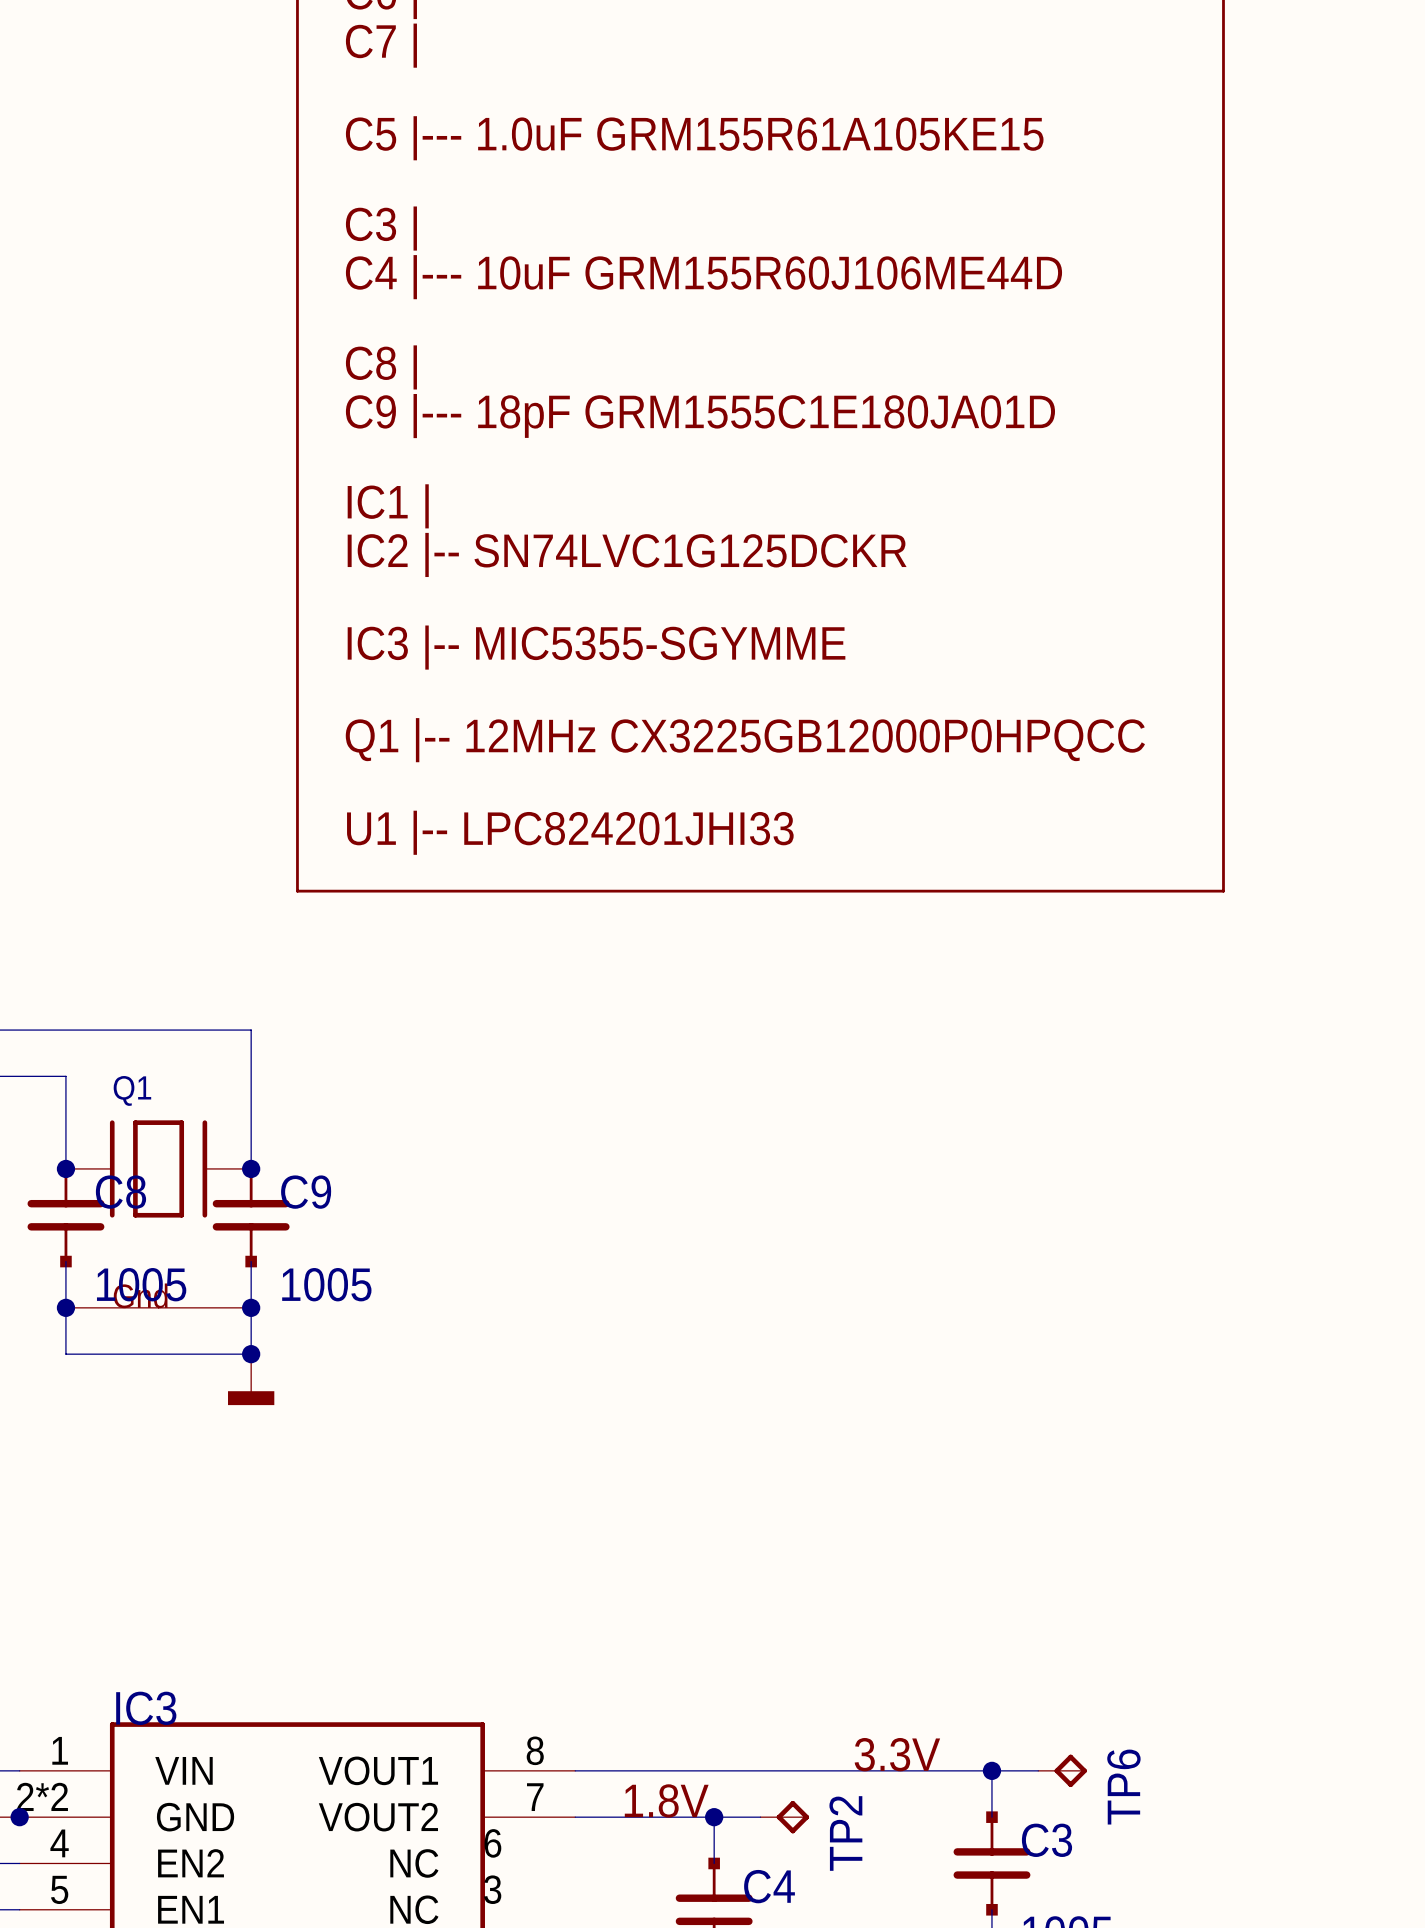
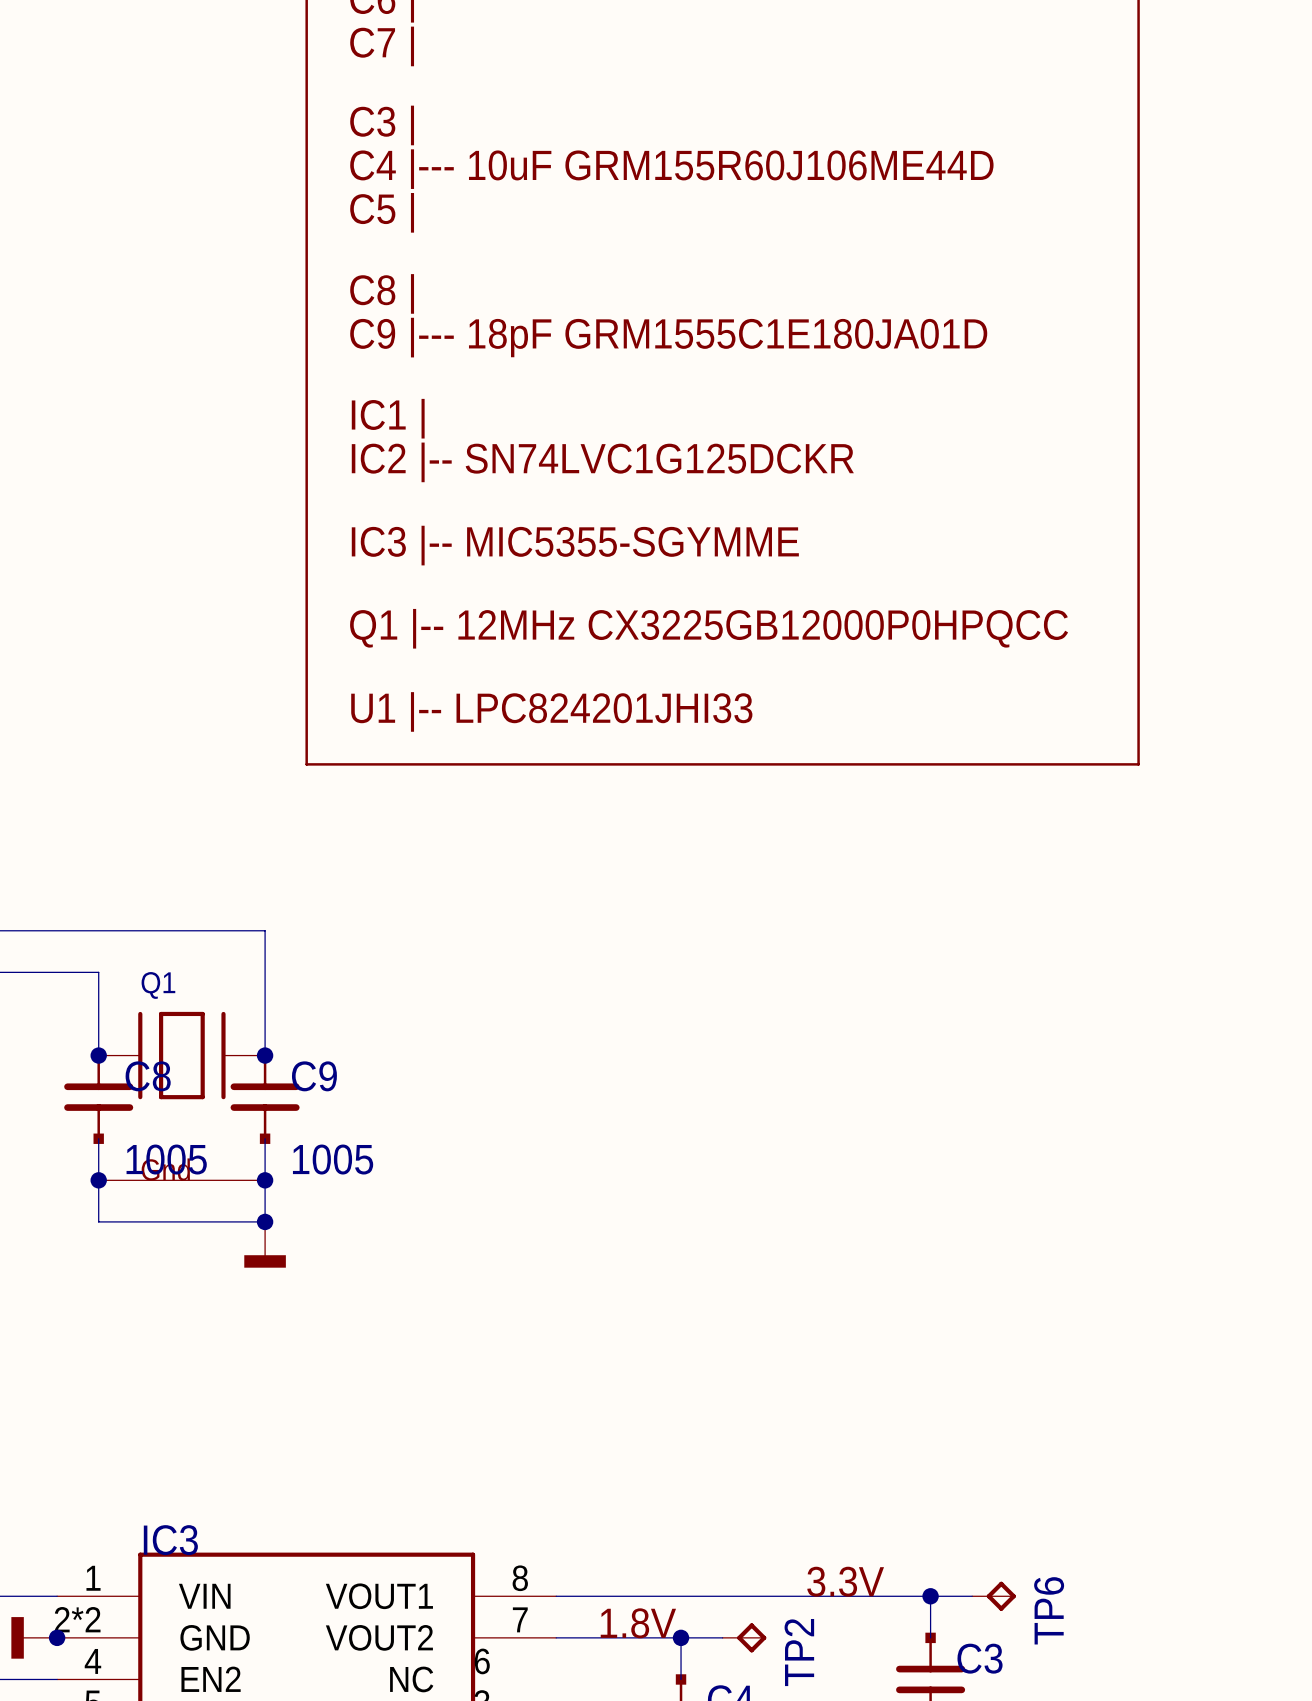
text: C5 |--- 1.0uF GRM155R61A105KE15 (694, 138) -> none
text position: C3 | (381, 228) -> C3 | (382, 125)
text: none -> C5 | (382, 212)
text position: C4 |--- 10uF GRM155R60J106ME44D (703, 277) -> C4 |--- 10uF GRM155R60J106ME44D (671, 169)
text position: C8 | (381, 367) -> C8 | (382, 293)
text position: C9 |--- 18pF GRM1555C1E180JA01D (700, 416) -> C9 |--- 18pF GRM1555C1E180JA01D (668, 337)
text position: IC1 | (388, 506) -> IC1 | (388, 418)
text position: IC2 |-- SN74LVC1G125DCKR (627, 554) -> IC2 |-- SN74LVC1G125DCKR (602, 462)
text position: IC3 |-- MIC5355-SGYMME (596, 647) -> IC3 |-- MIC5355-SGYMME (575, 545)
text position: Q1 |-- 12MHz CX3225GB12000P0HPQCC (745, 740) -> Q1 |-- 12MHz CX3225GB12000P0HPQCC (709, 628)
text position: U1 |-- LPC824201JHI33 (570, 832) -> U1 |-- LPC824201JHI33 (551, 711)
line: (297, 844) (297, 891) (1223, 891) (1223, 844) -> (306, 764) (1138, 764)

